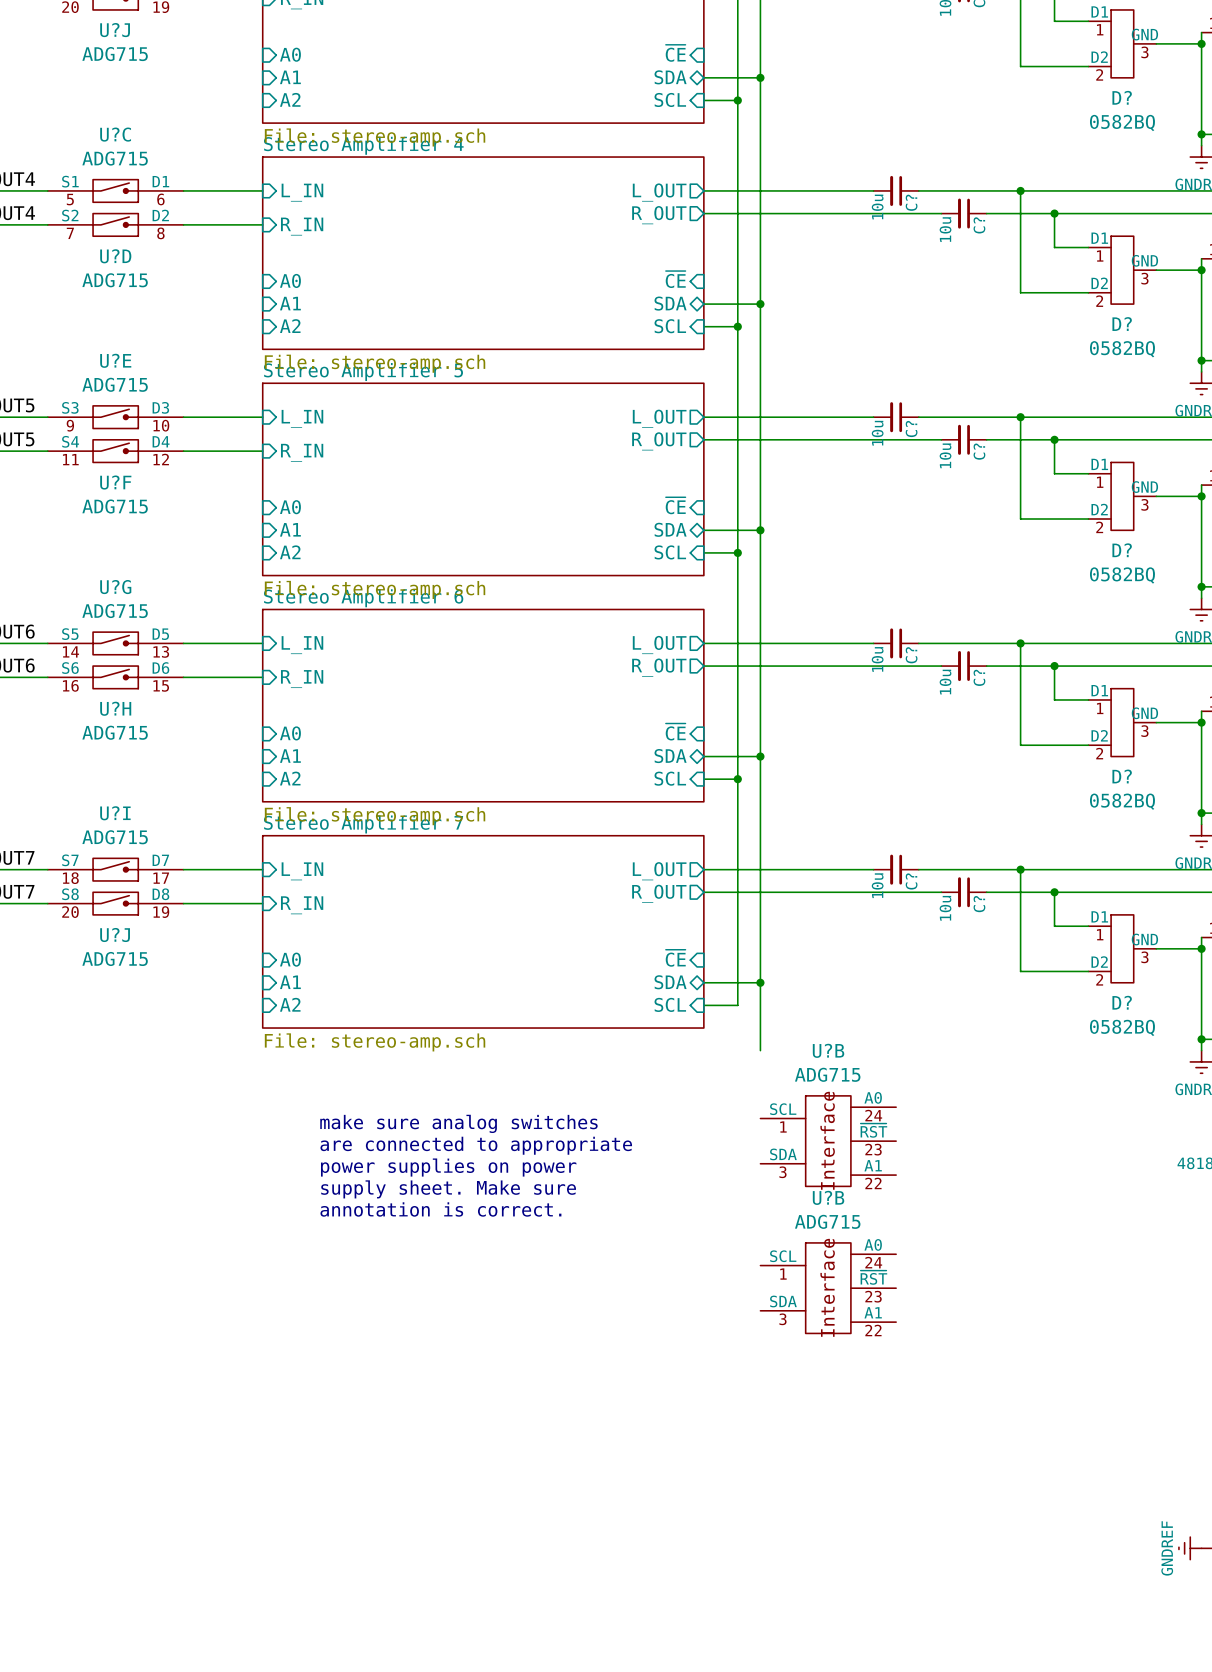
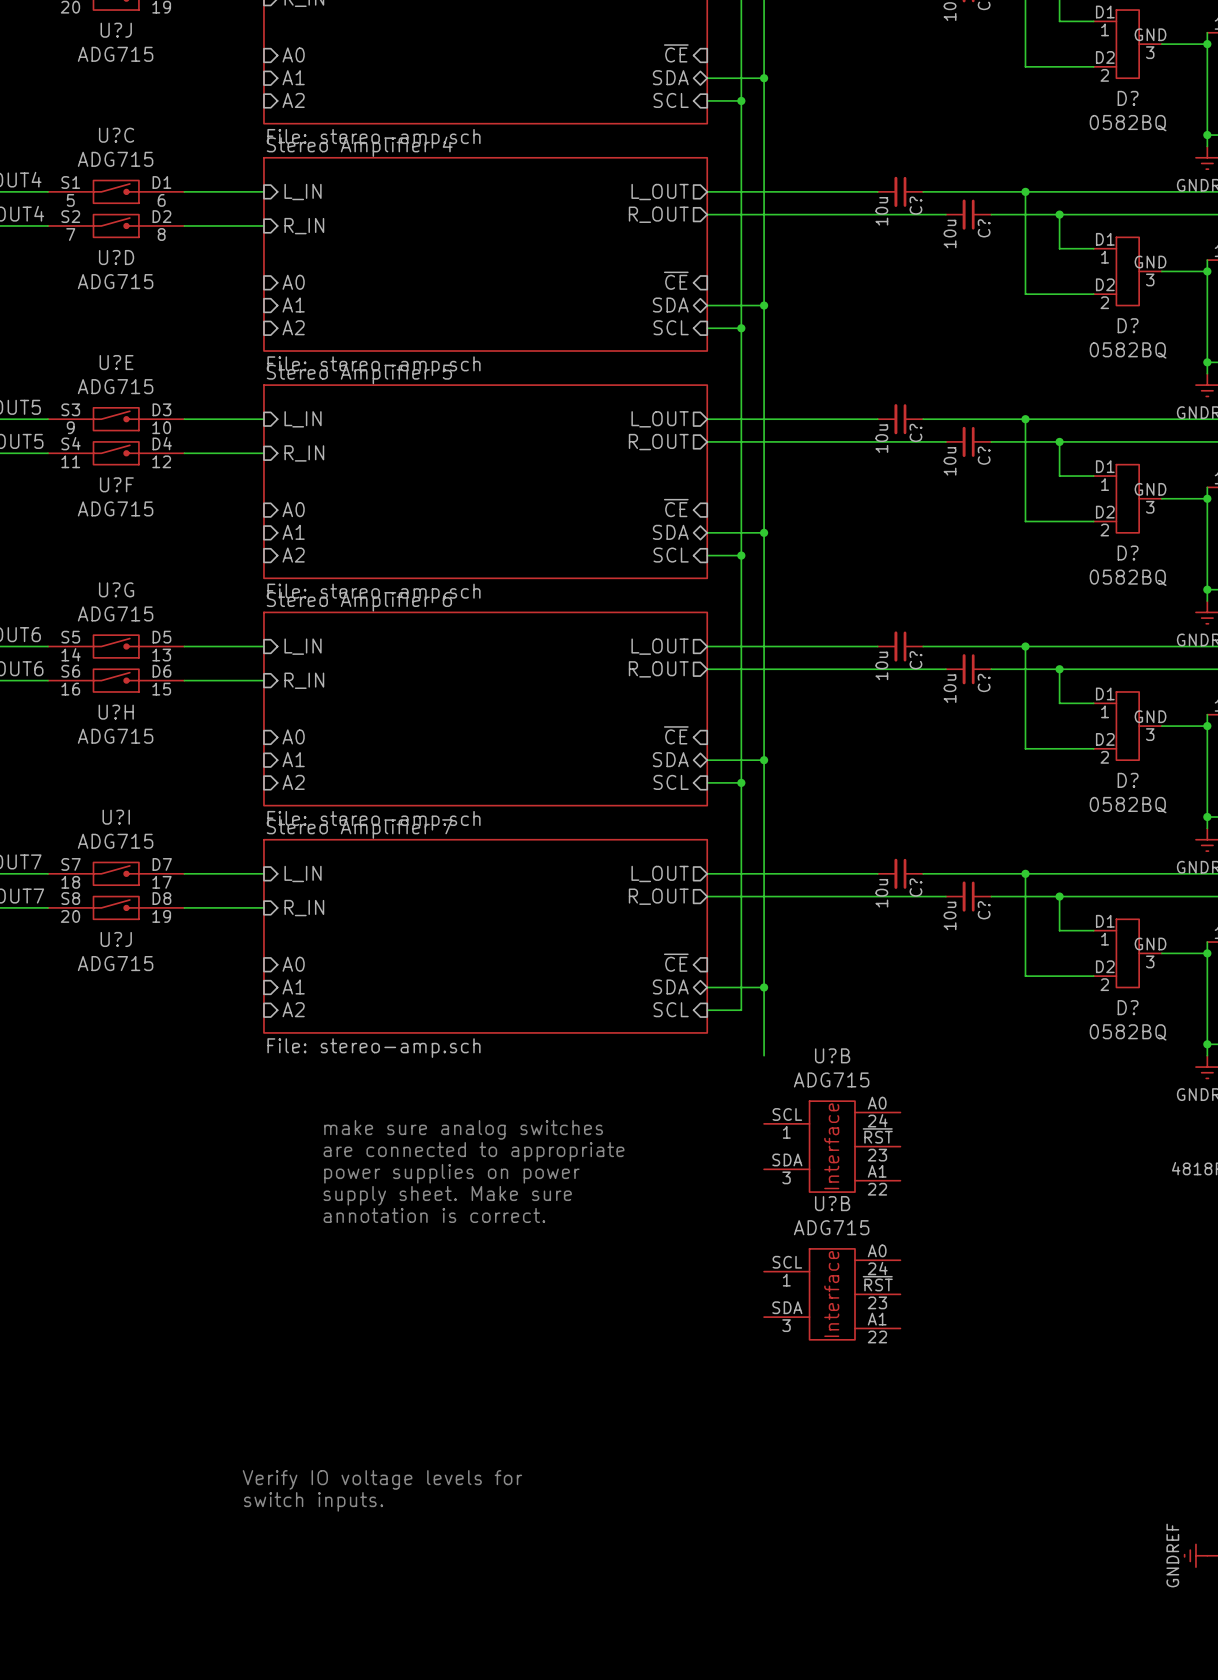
text: none -> Verify IO voltage levels for (382, 1479)
text: none -> switch inputs. (313, 1501)

